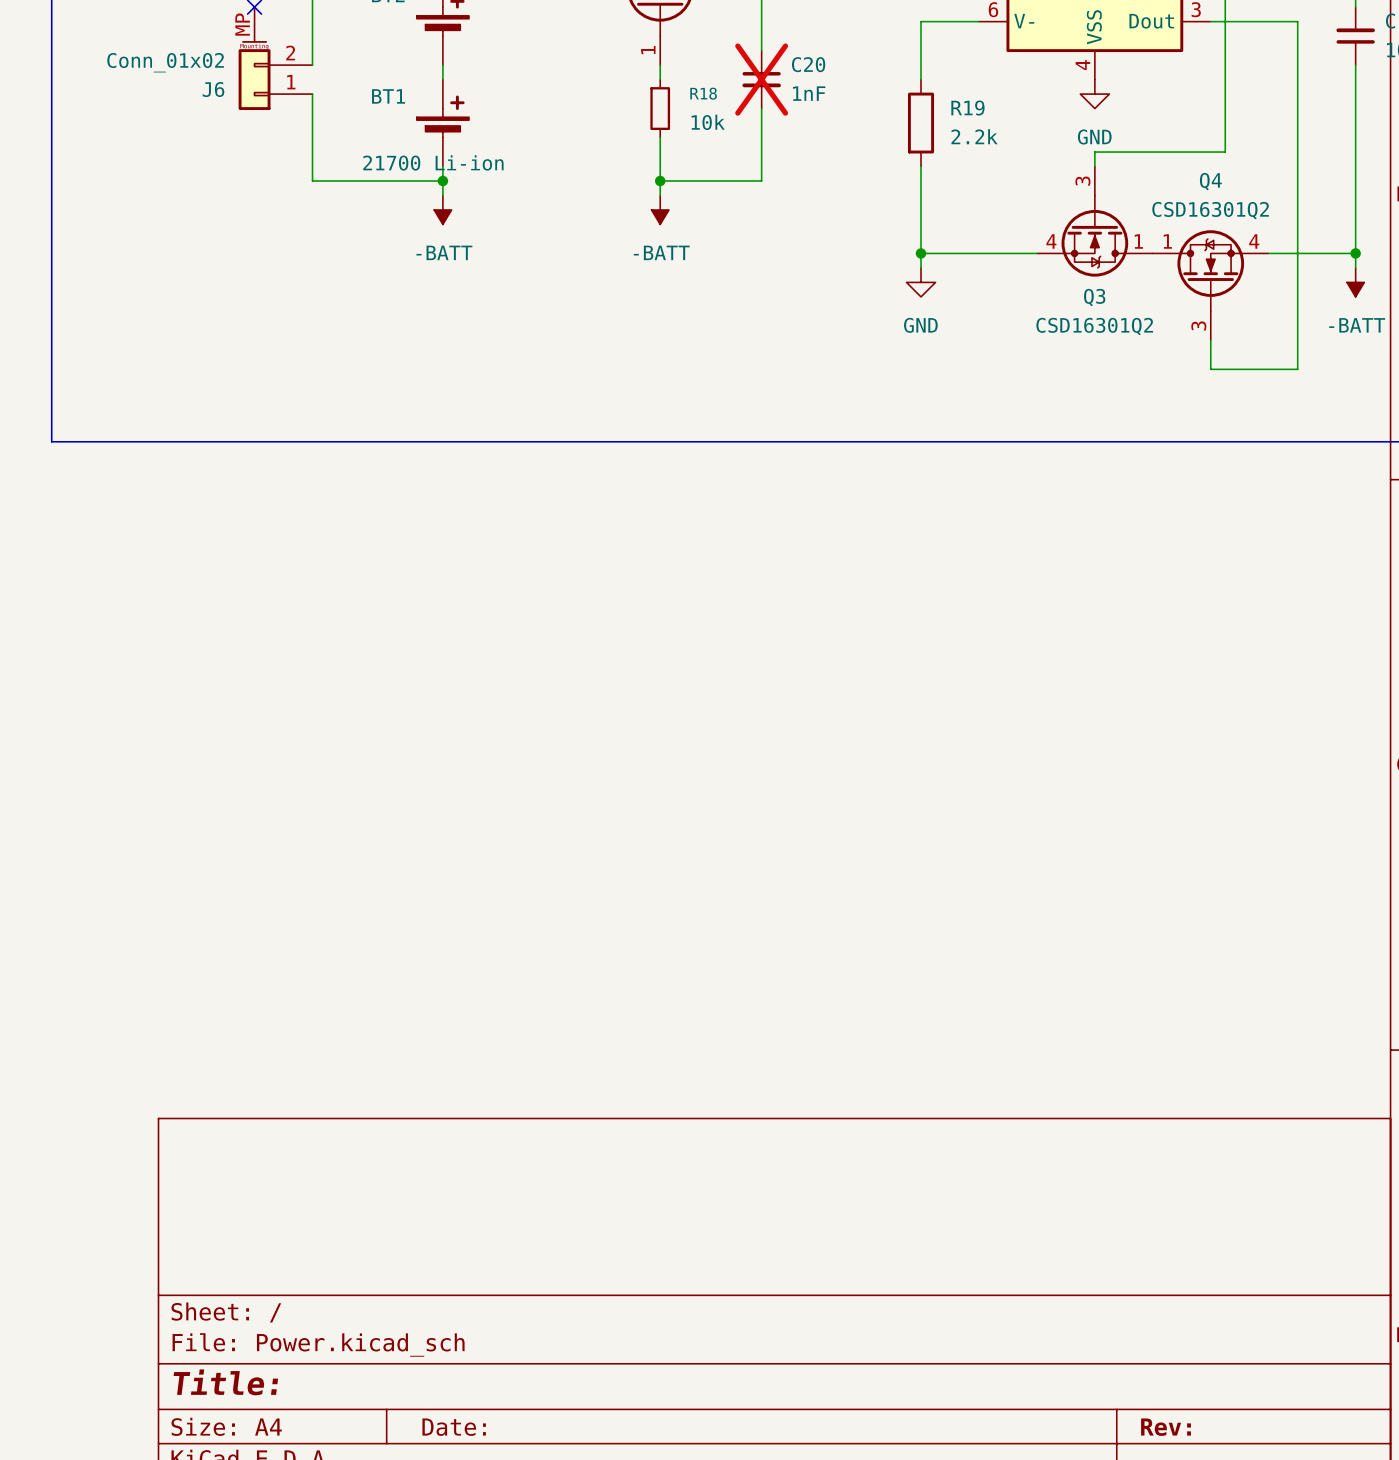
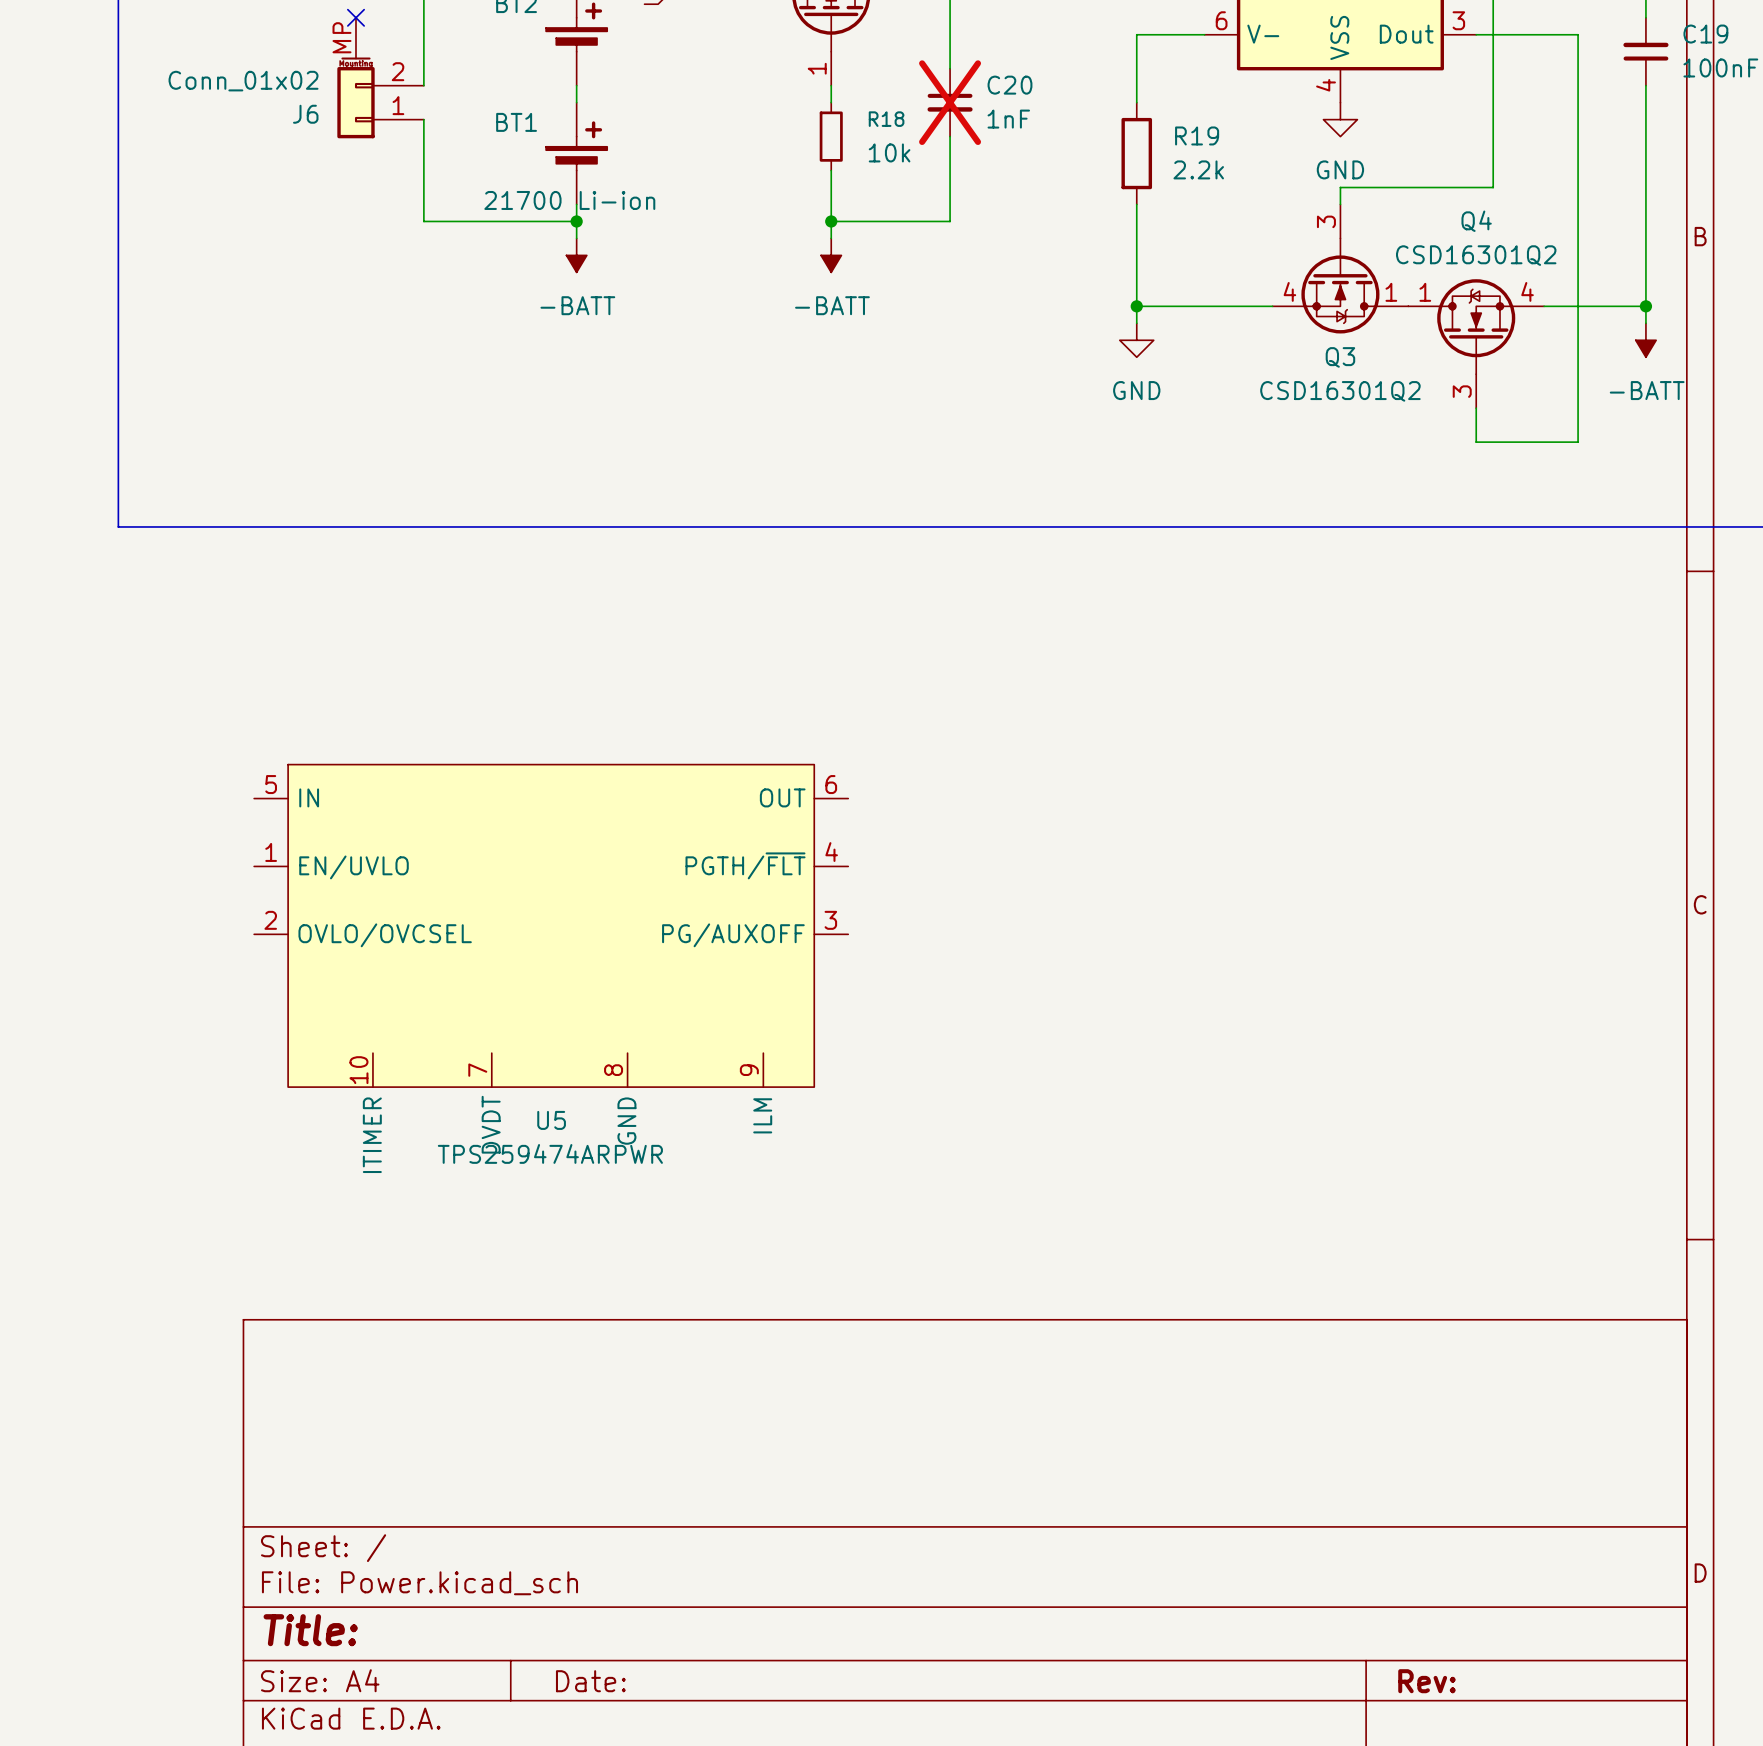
U5: none -> TPS259474ARPWR (551, 925)

